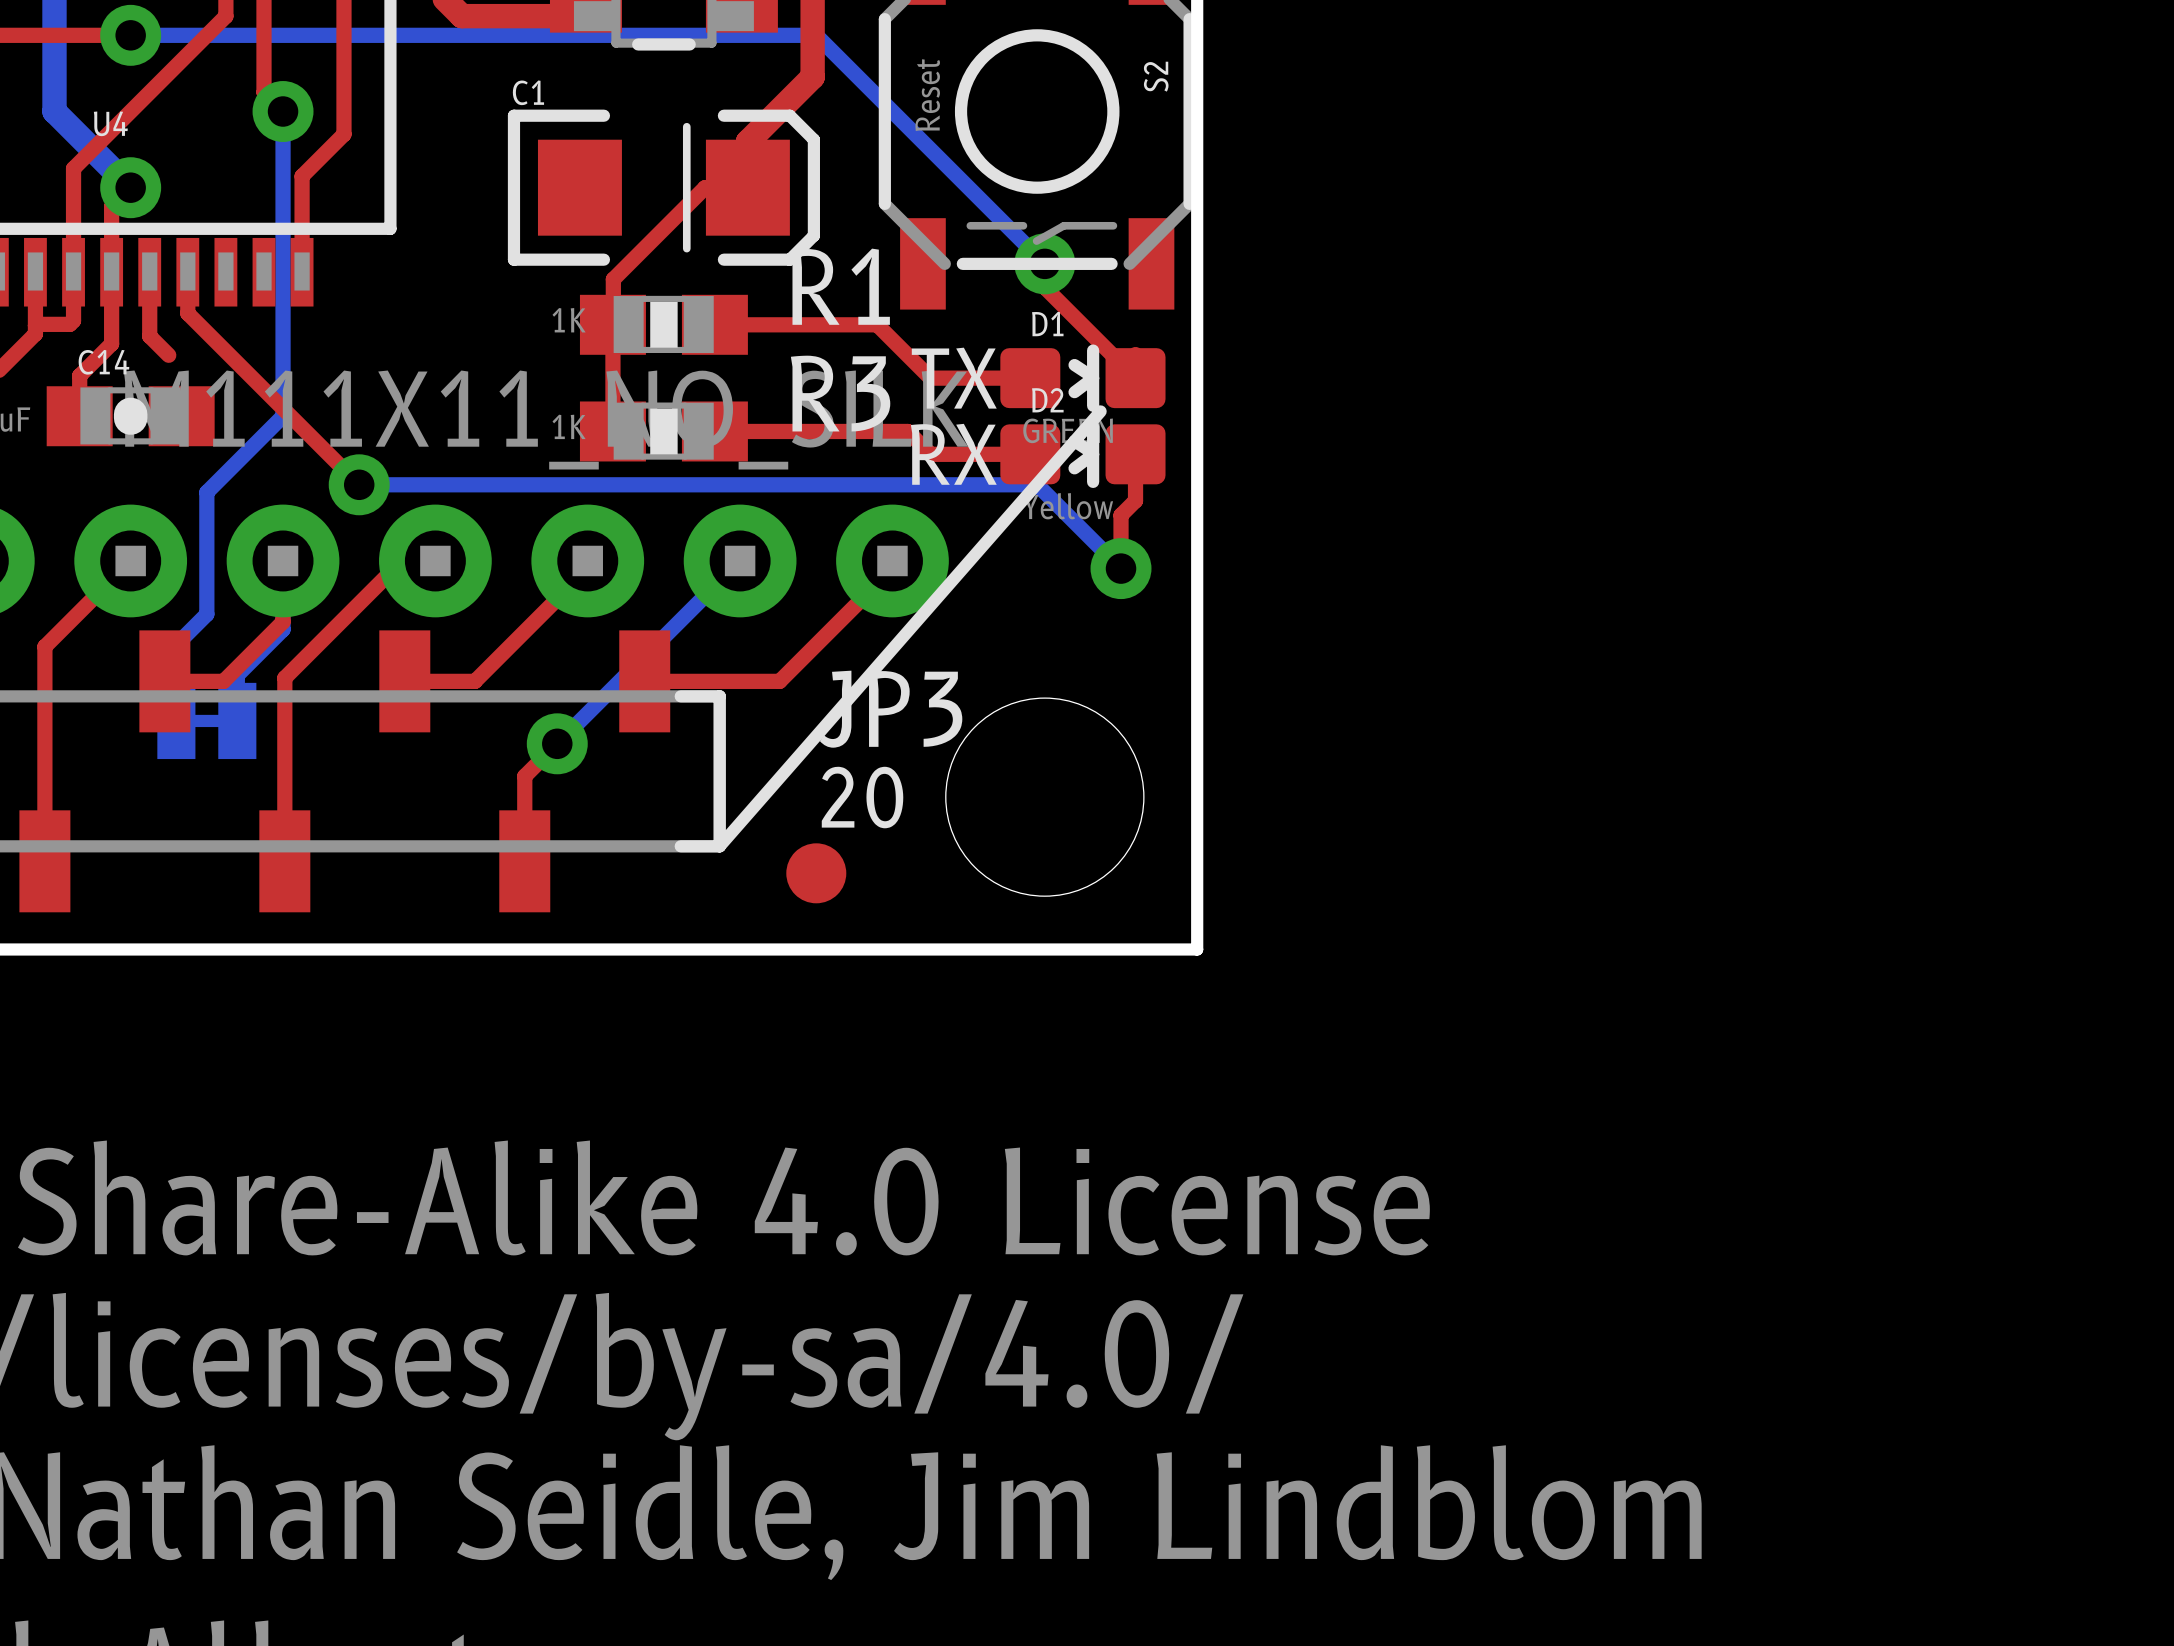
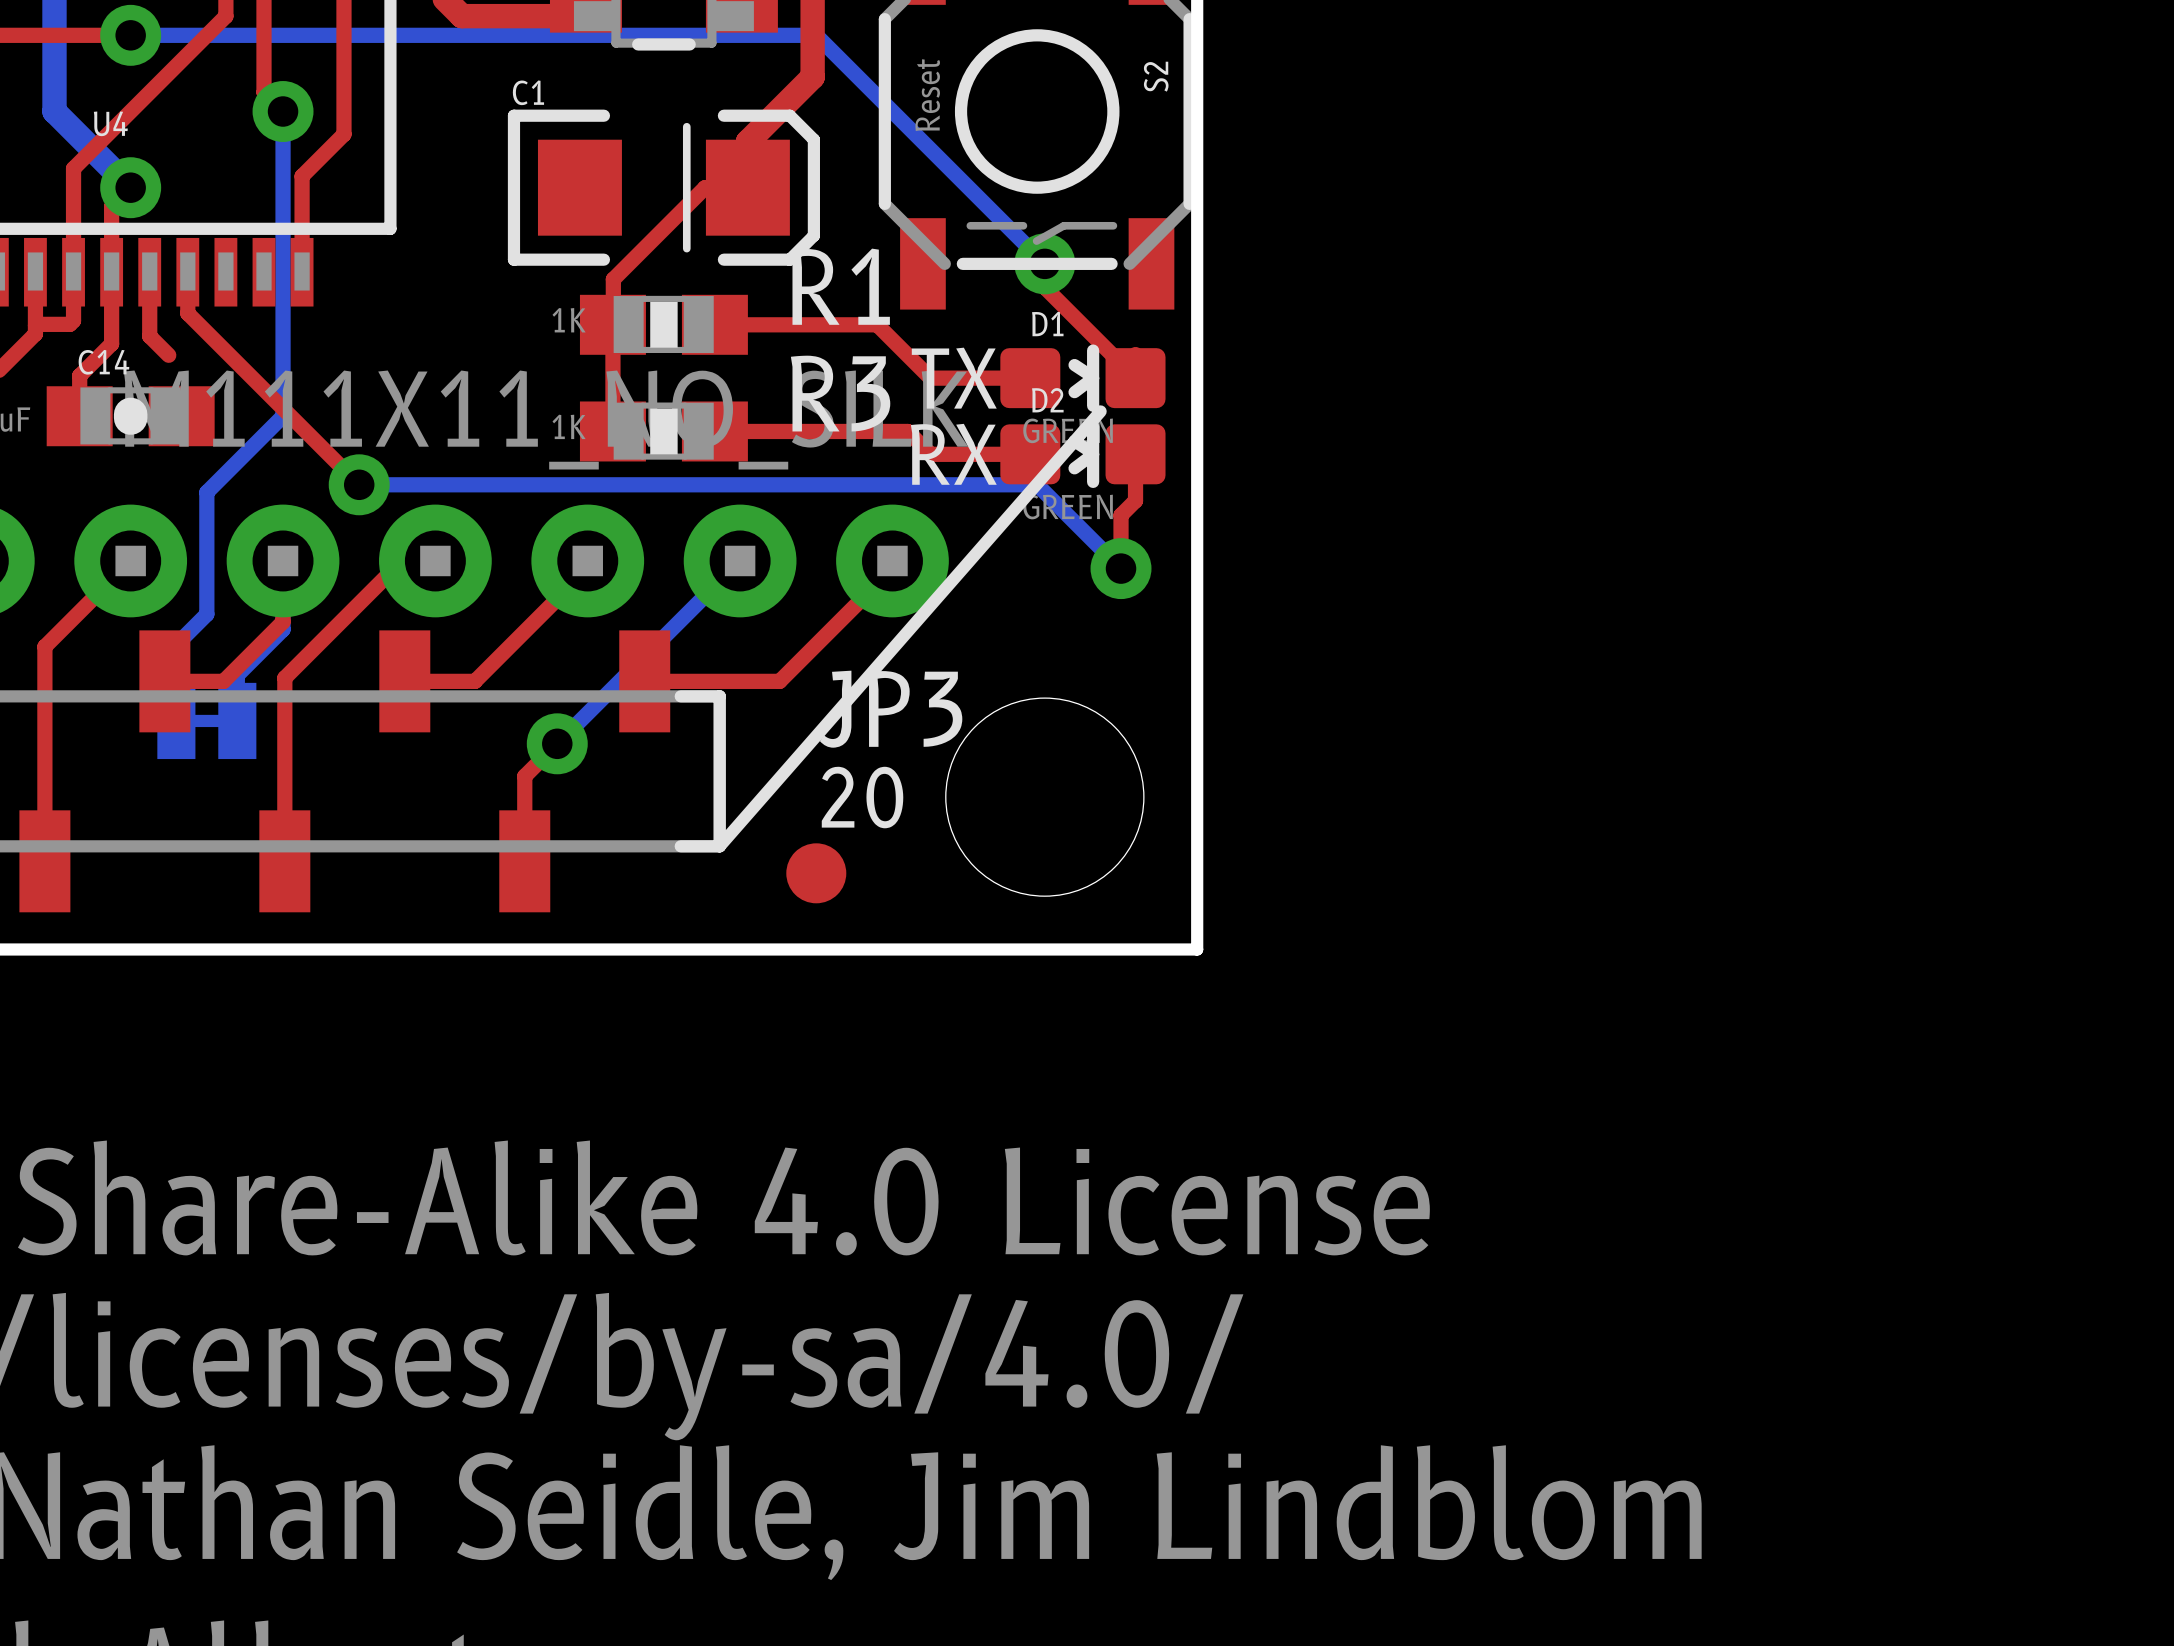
D2 value: Yellow (1067, 506) -> GREEN (1068, 507)

